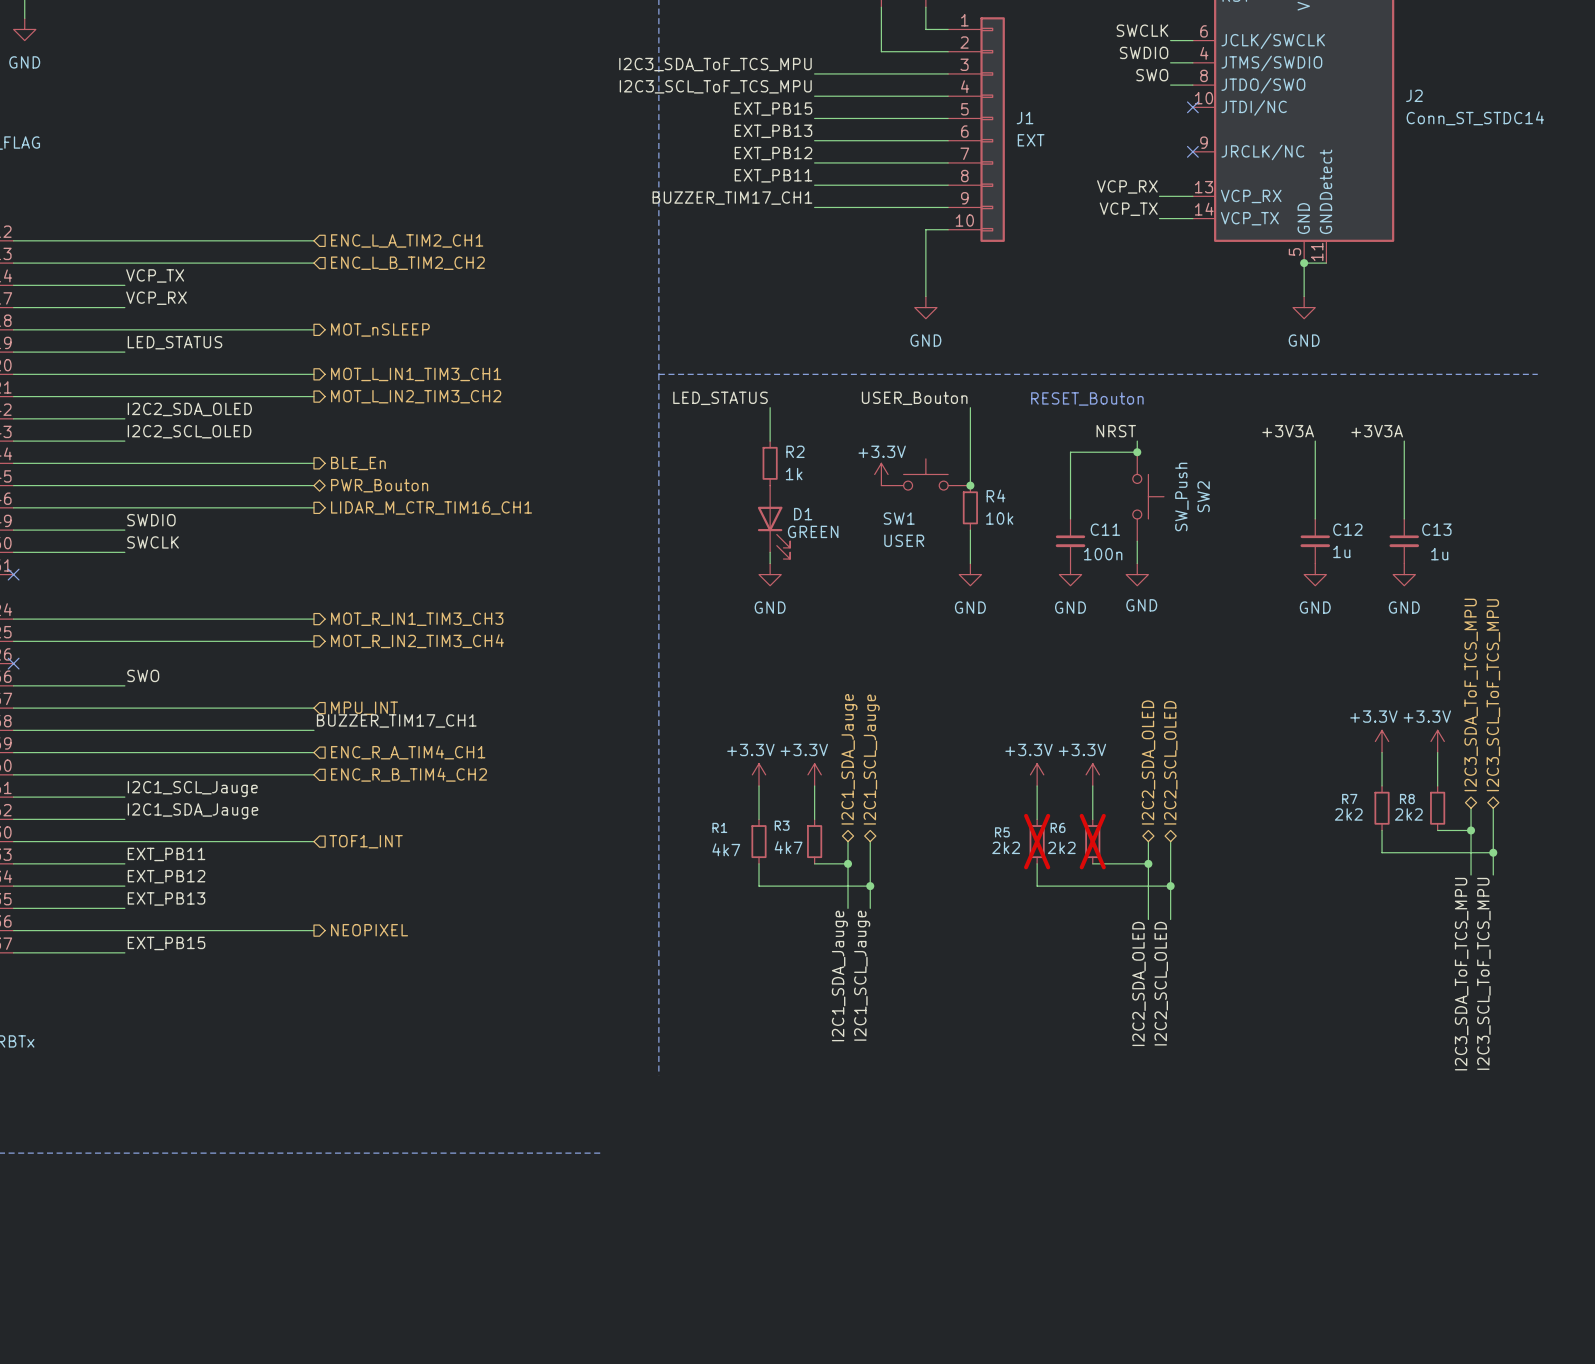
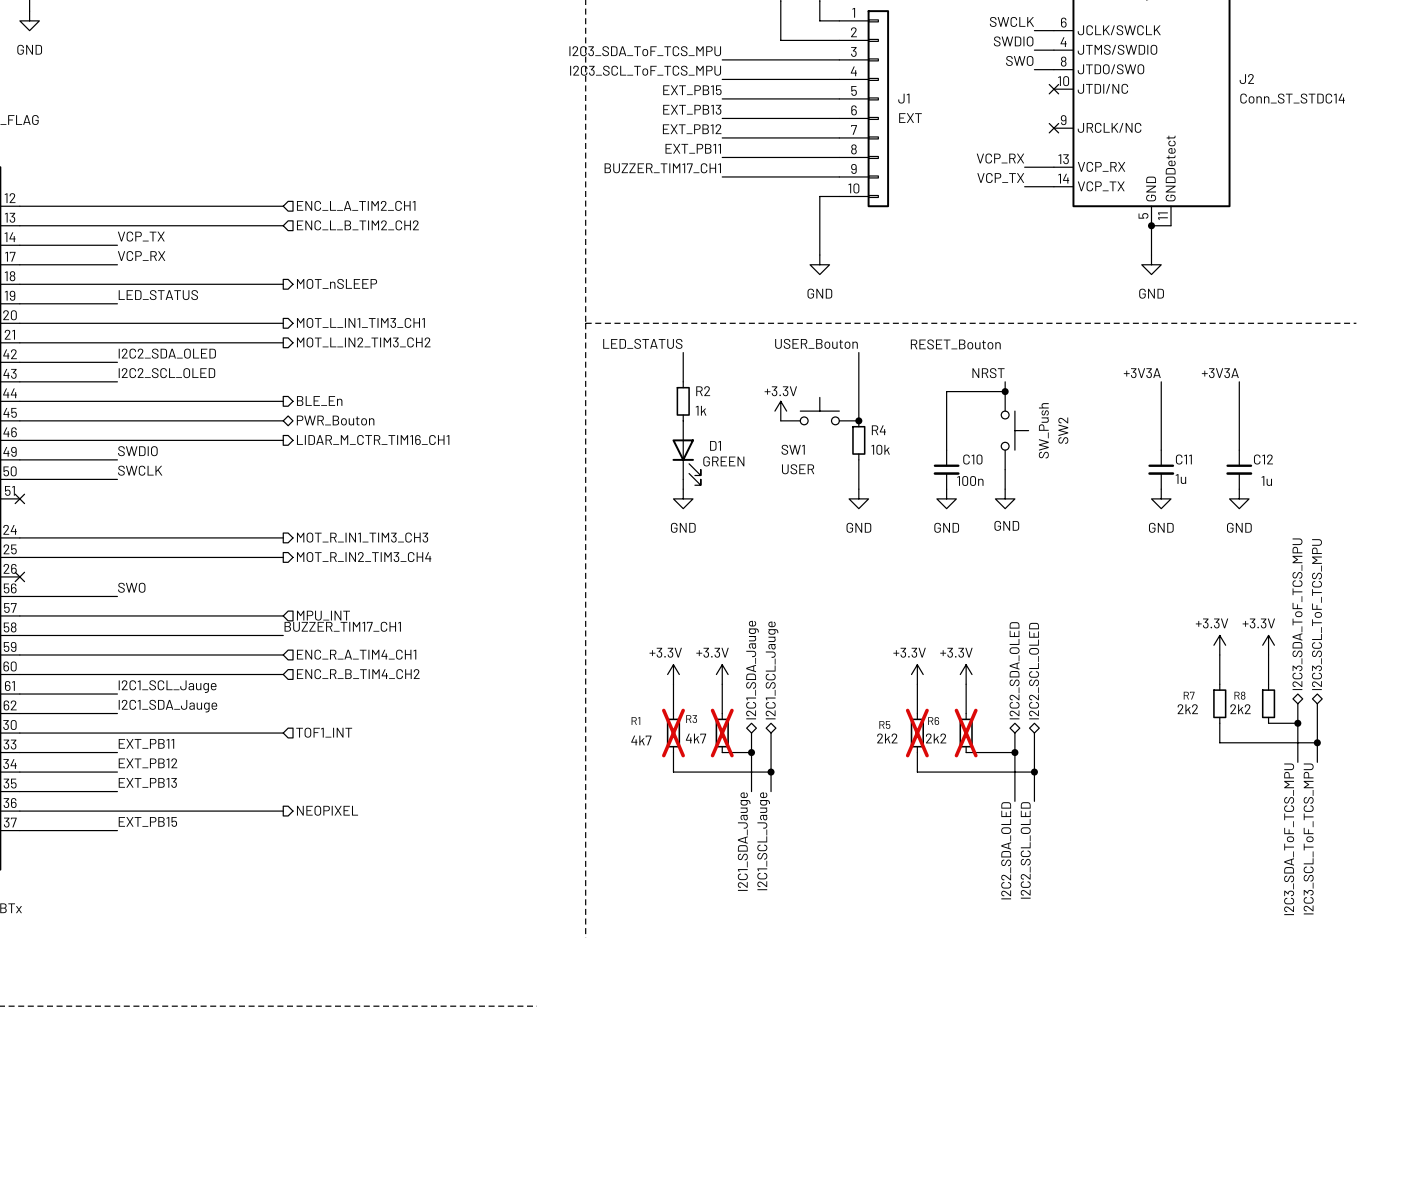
C11 name: C11 (1105, 529) -> C10 (972, 459)
C12 name: C12 (1347, 529) -> C11 (1183, 459)
C13 name: C13 (1436, 529) -> C12 (1263, 459)
R1 do-not-place cross: none -> (673, 733)
R3 do-not-place cross: none -> (722, 733)

